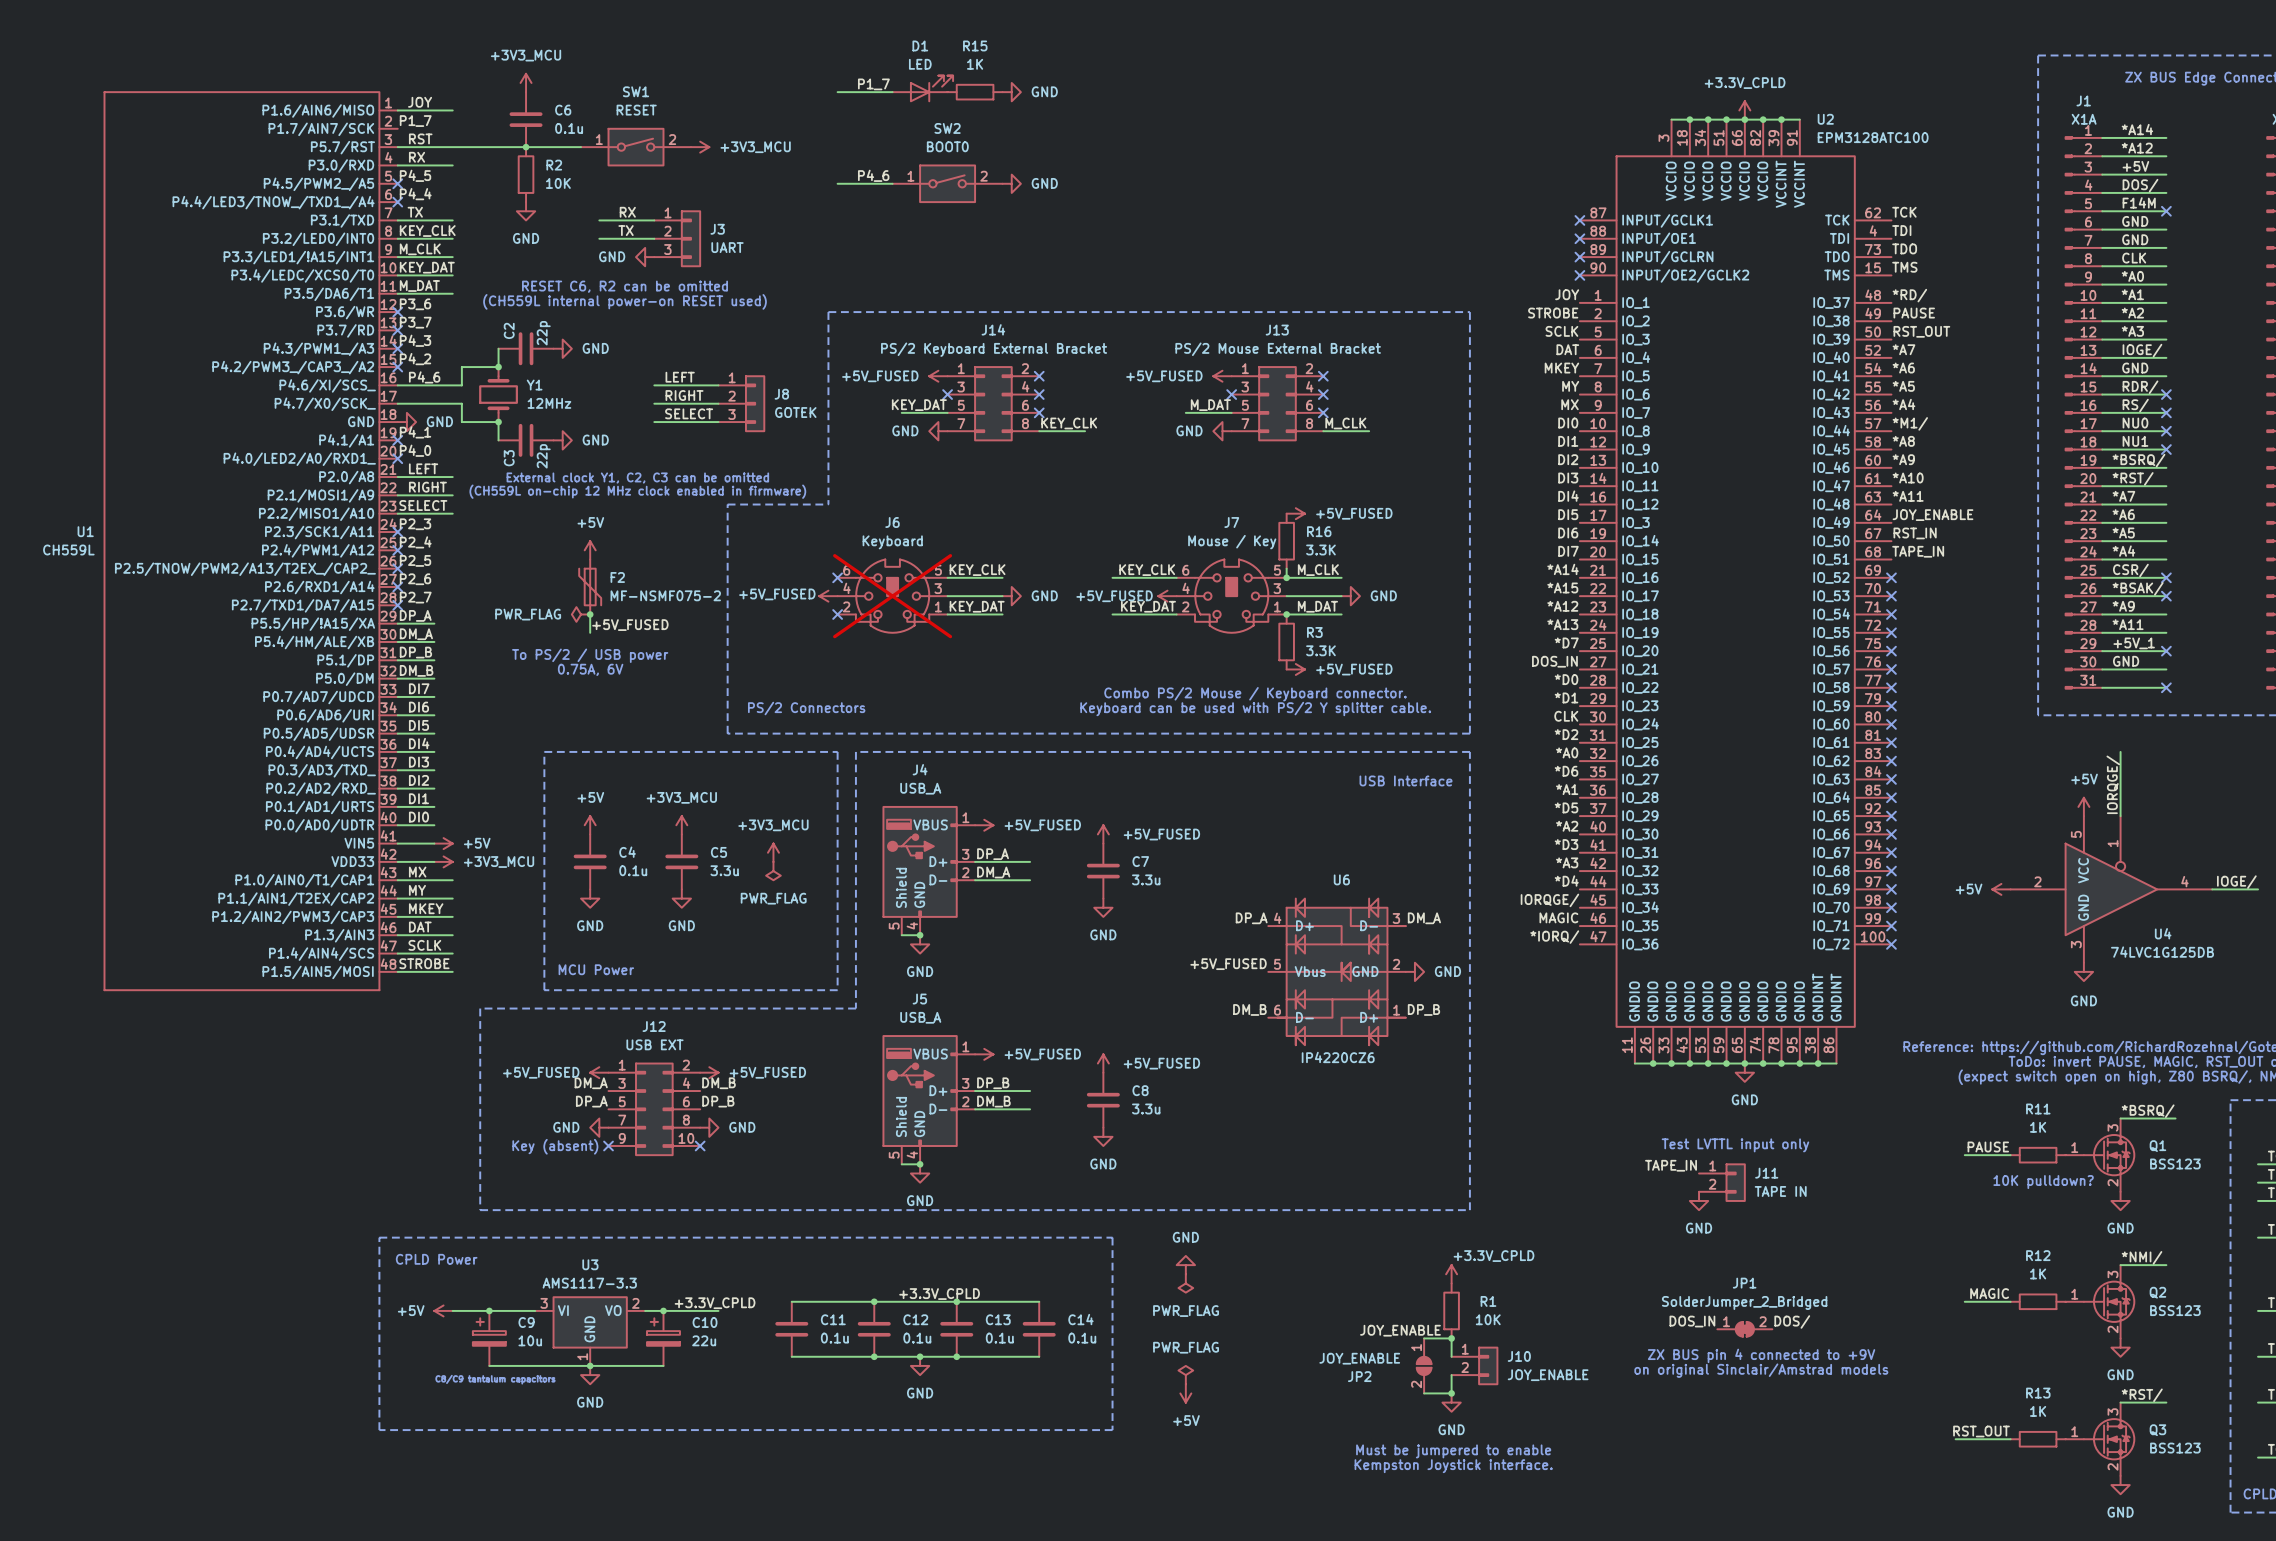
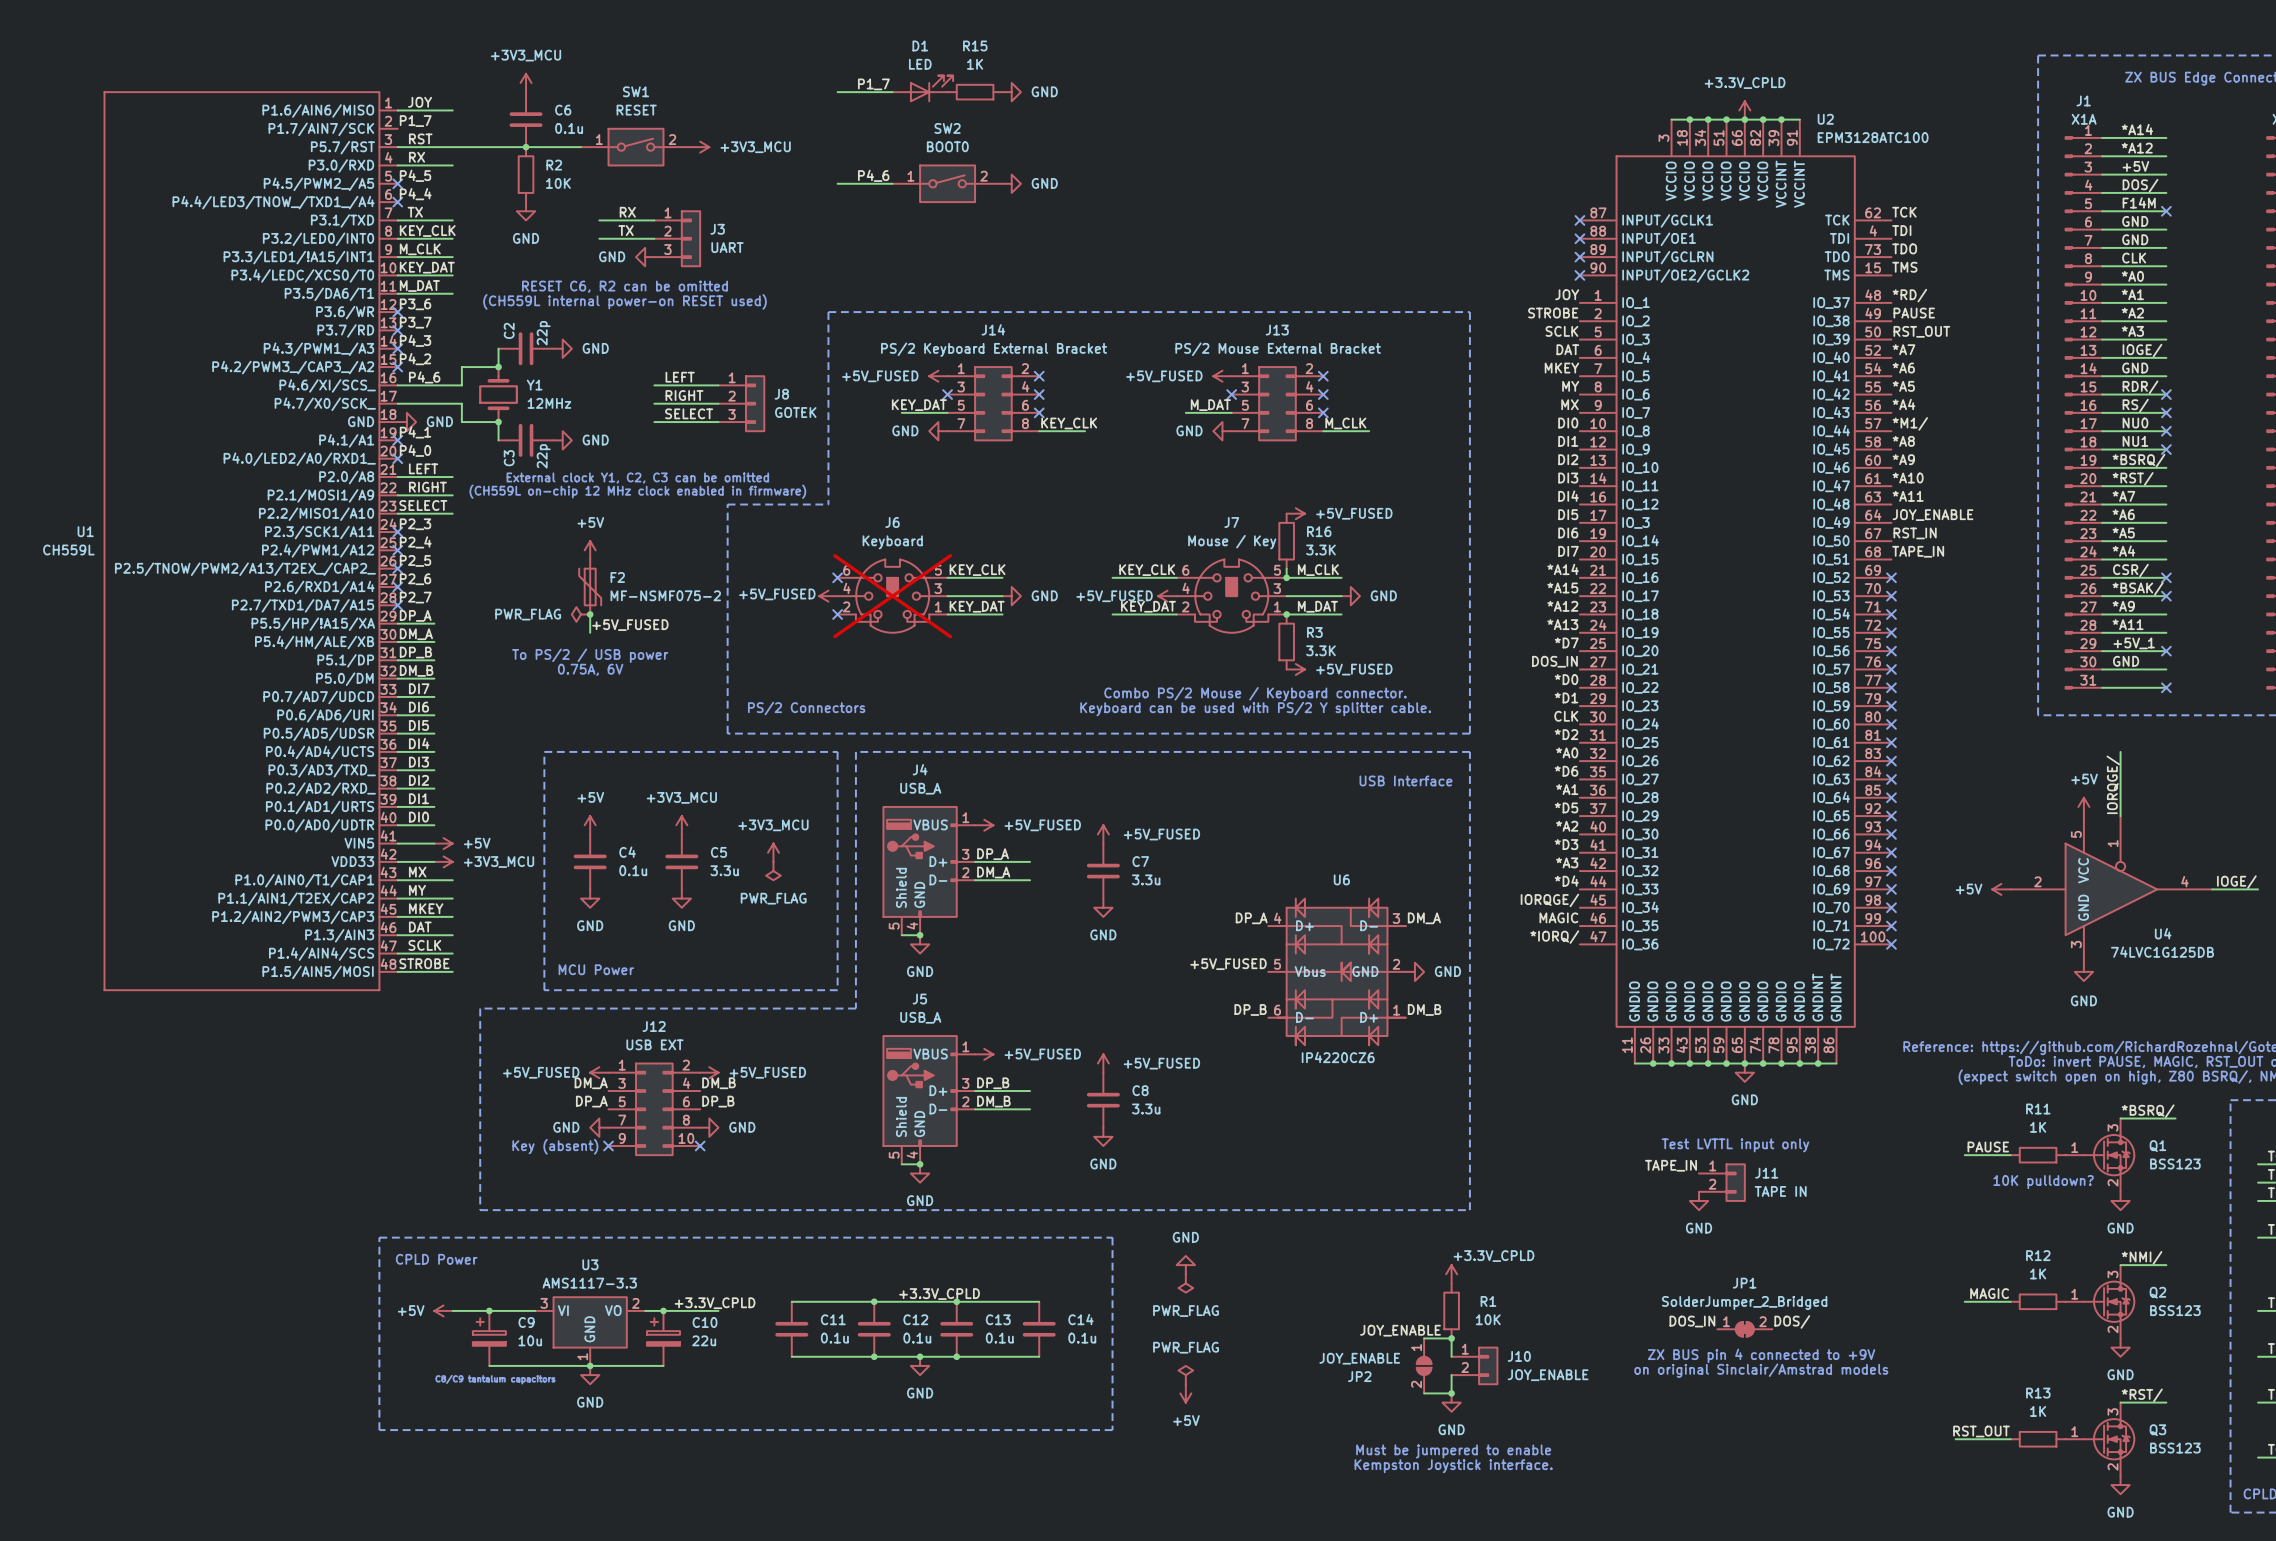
label: DM_B (1249, 1009) -> DP_B (1250, 1009)
label: DP_B (1423, 1009) -> DM_B (1424, 1009)

